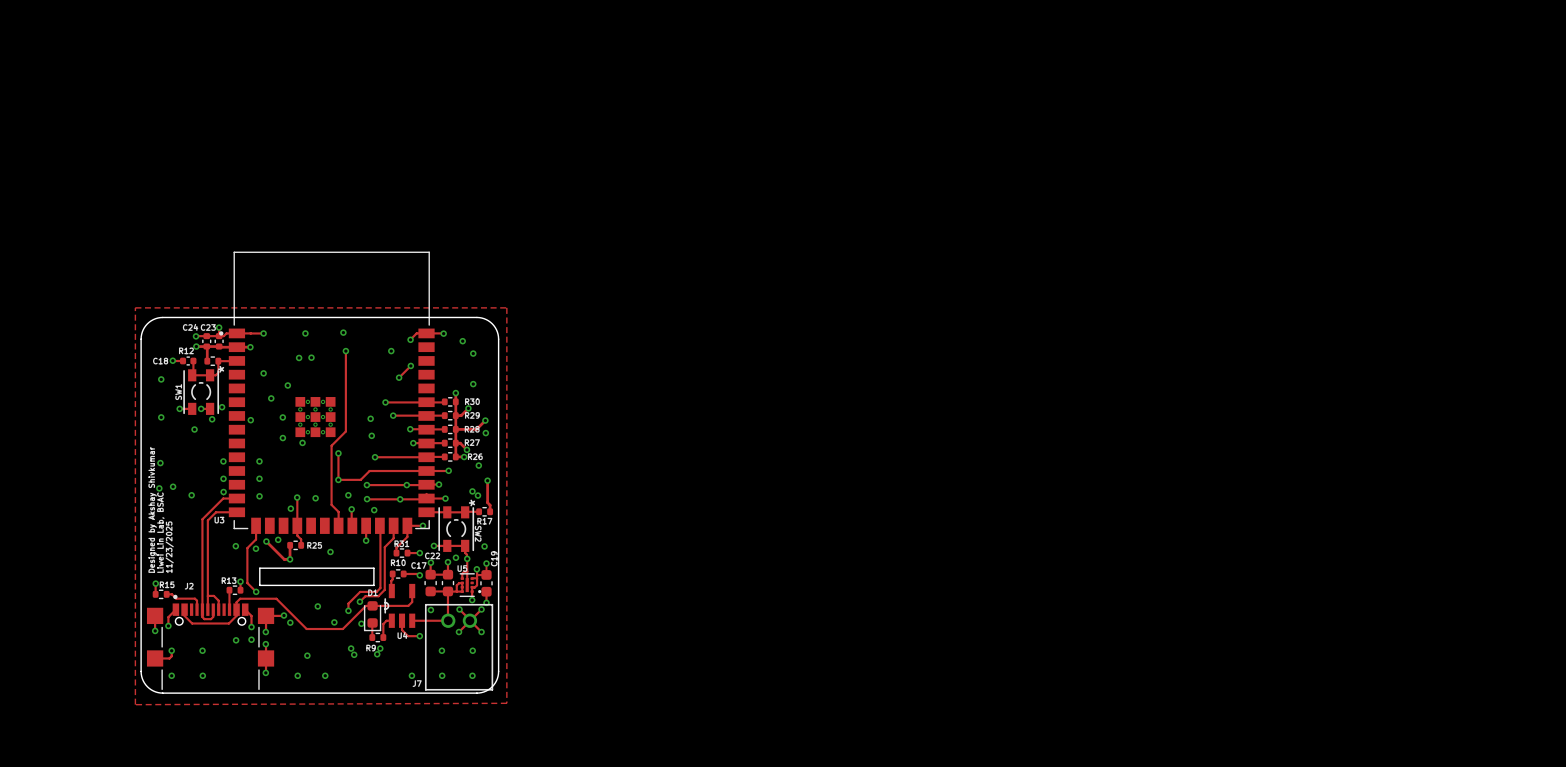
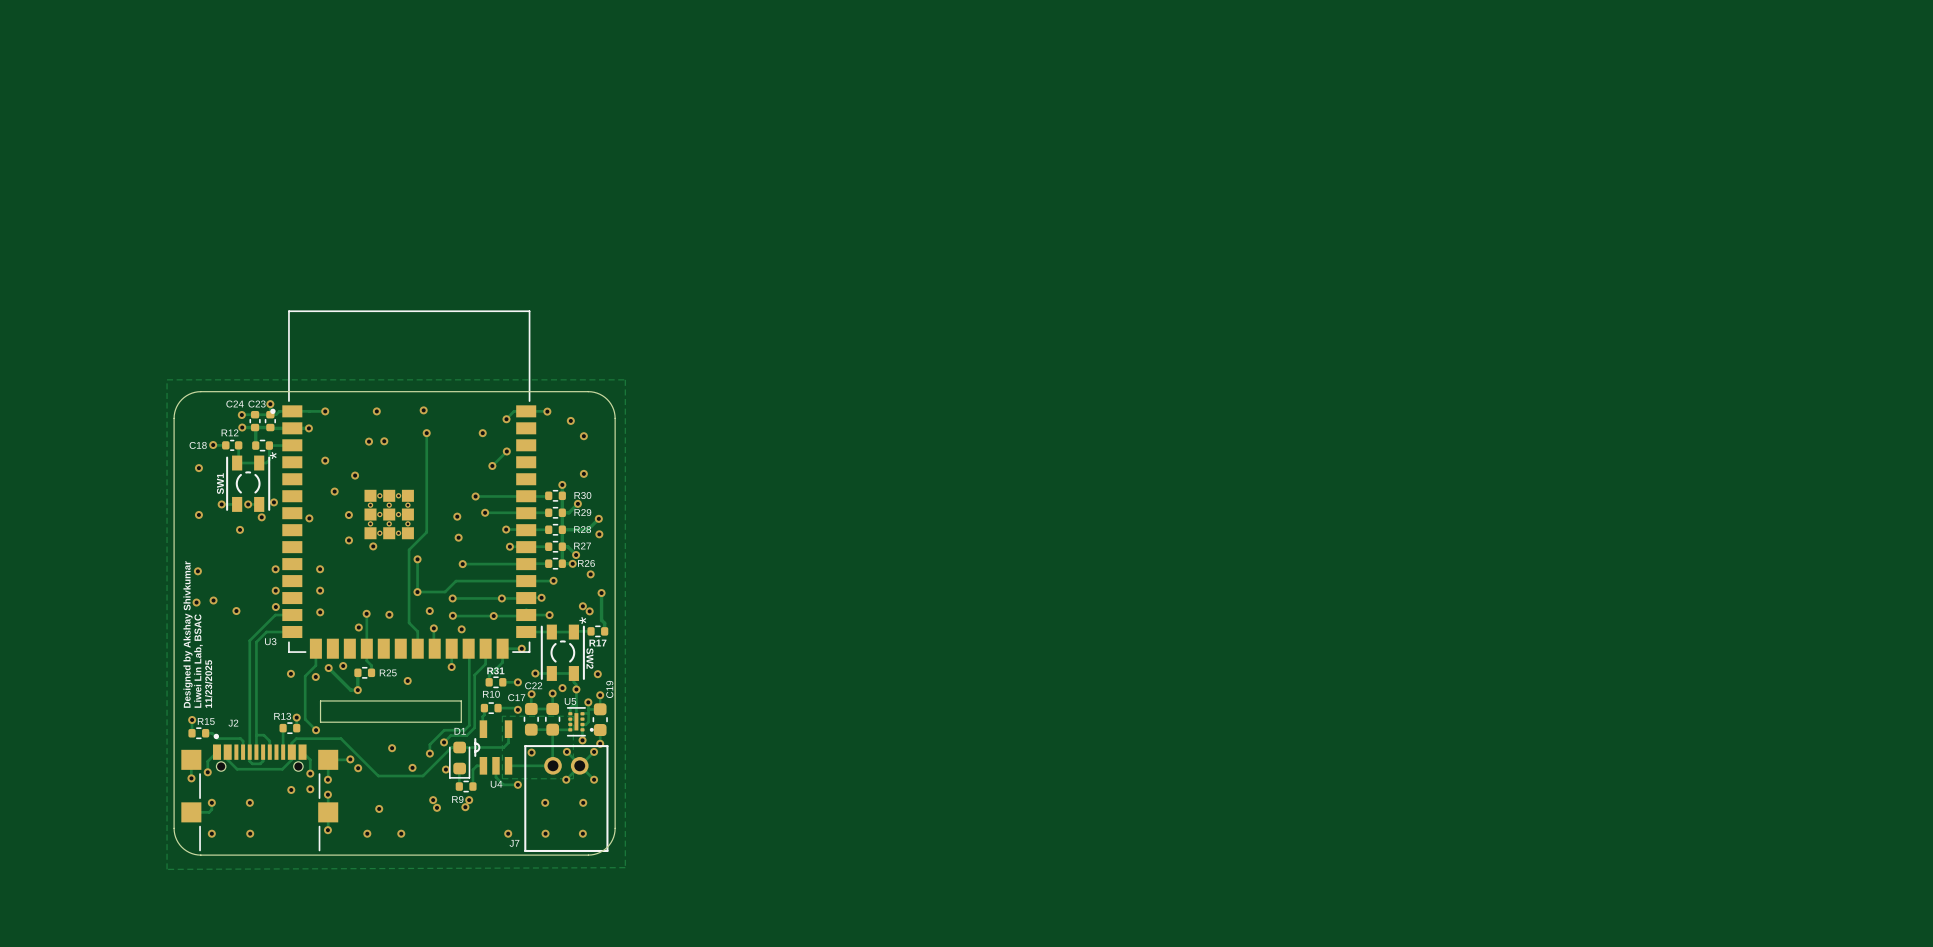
zone outline: none -> (502, 716) (573, 716) (573, 778) (502, 778) (502, 716)
track: (462, 583) (456, 585) (456, 591) -> none

